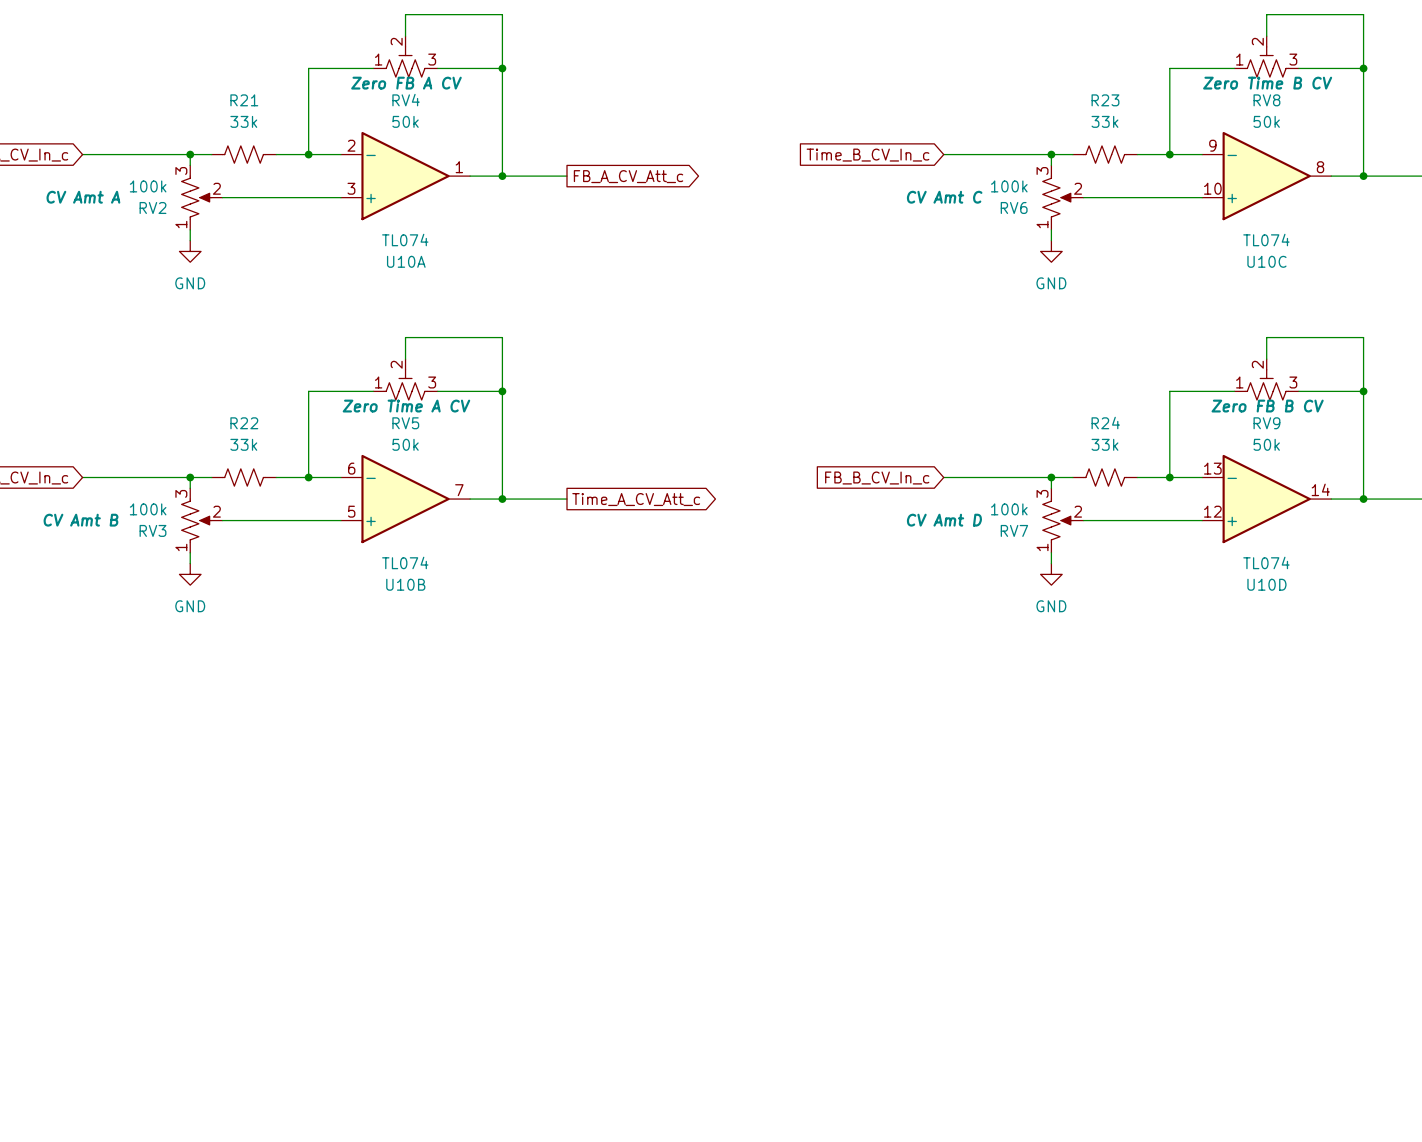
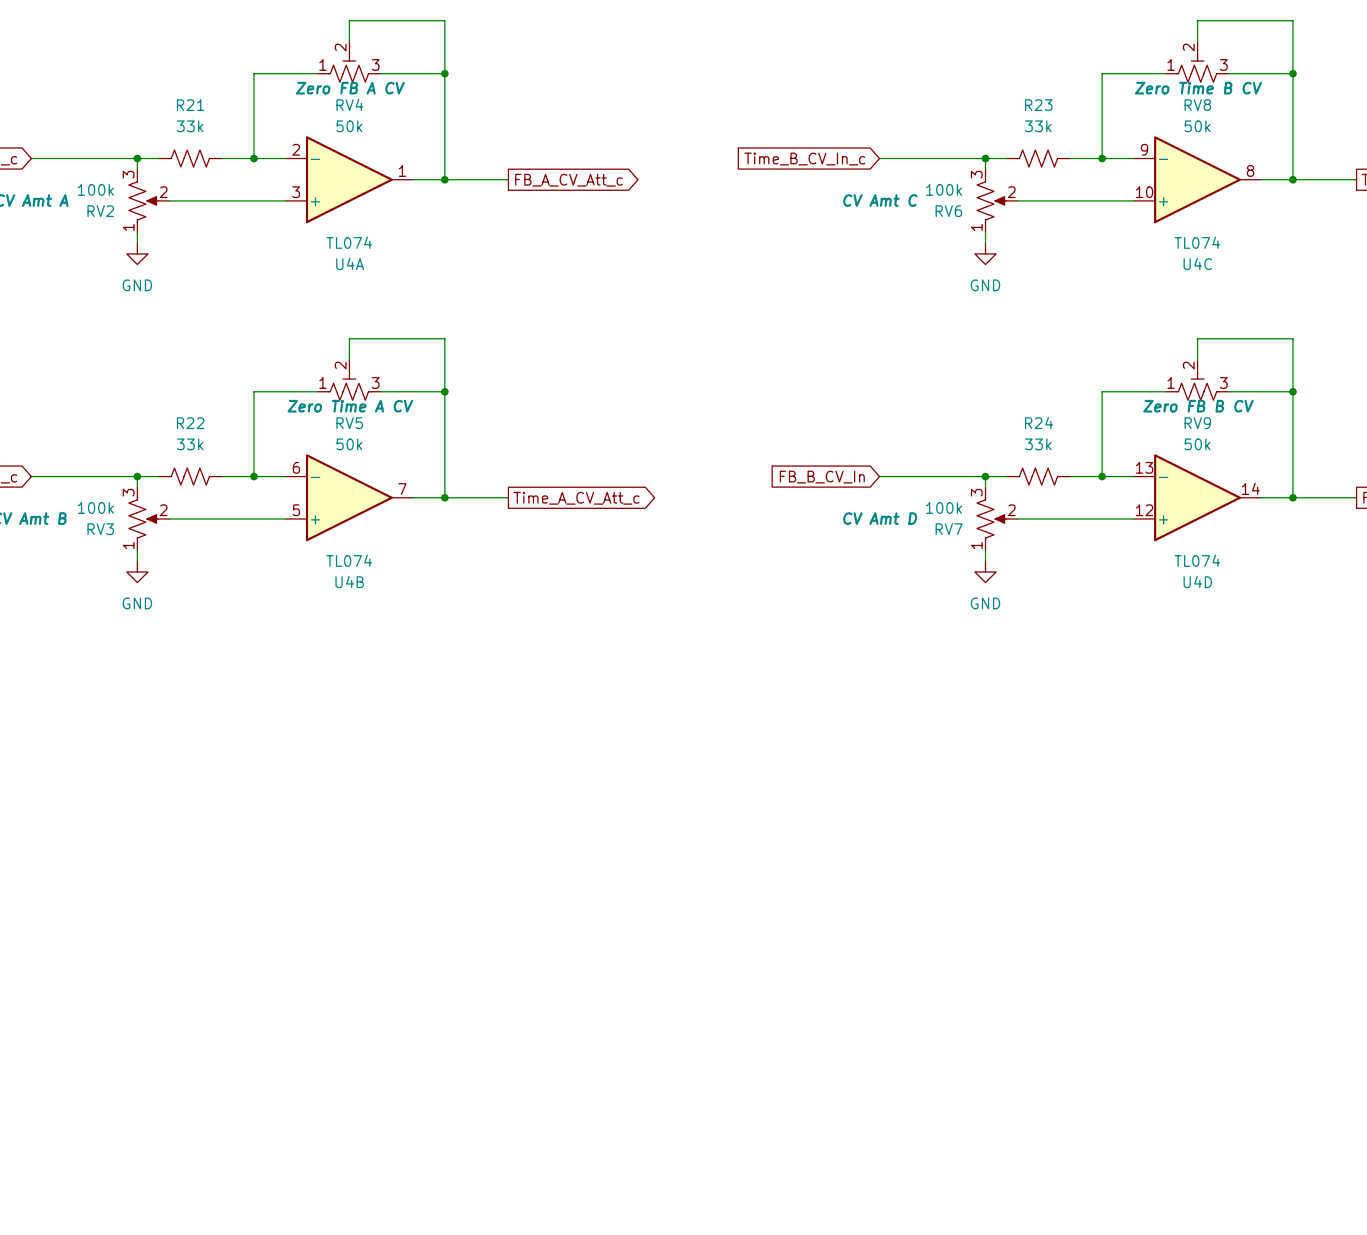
U10A name: U10A (406, 261) -> U4A (350, 263)
U10C name: U10C (1266, 261) -> U4C (1197, 263)
global label: FB_B_CV_In_c (877, 478) -> FB_B_CV_In (822, 477)
U10B name: U10B (405, 584) -> U4B (349, 581)
U10D name: U10D (1266, 584) -> U4D (1197, 581)

